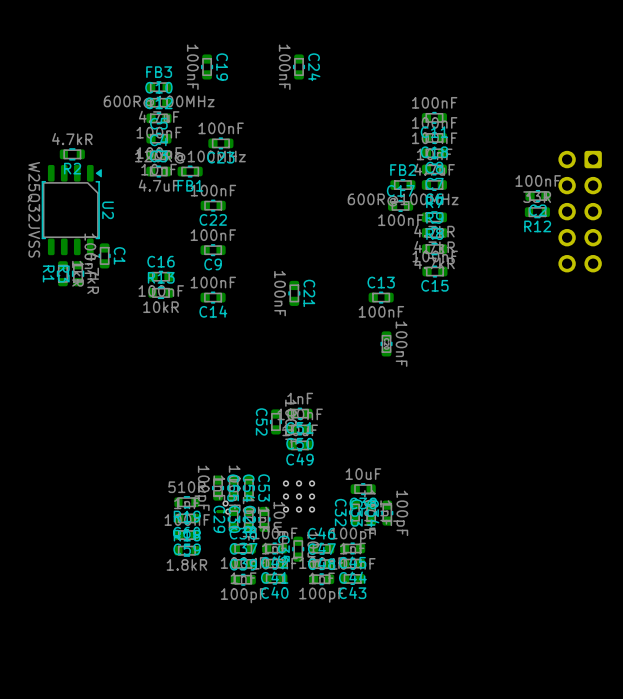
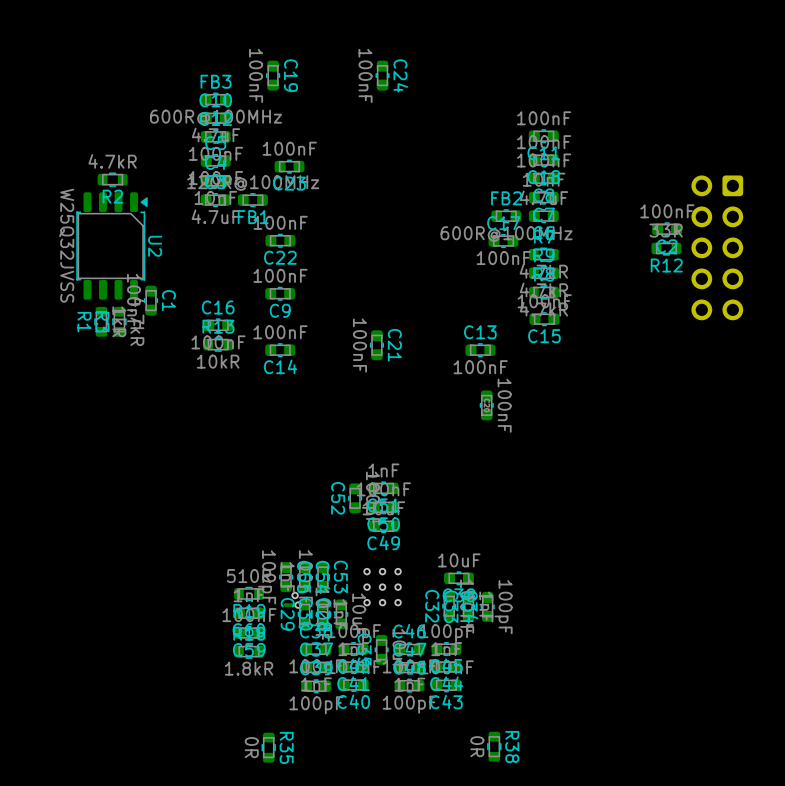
R38: none -> 0R (494, 746)
R35: none -> 0R (268, 747)

